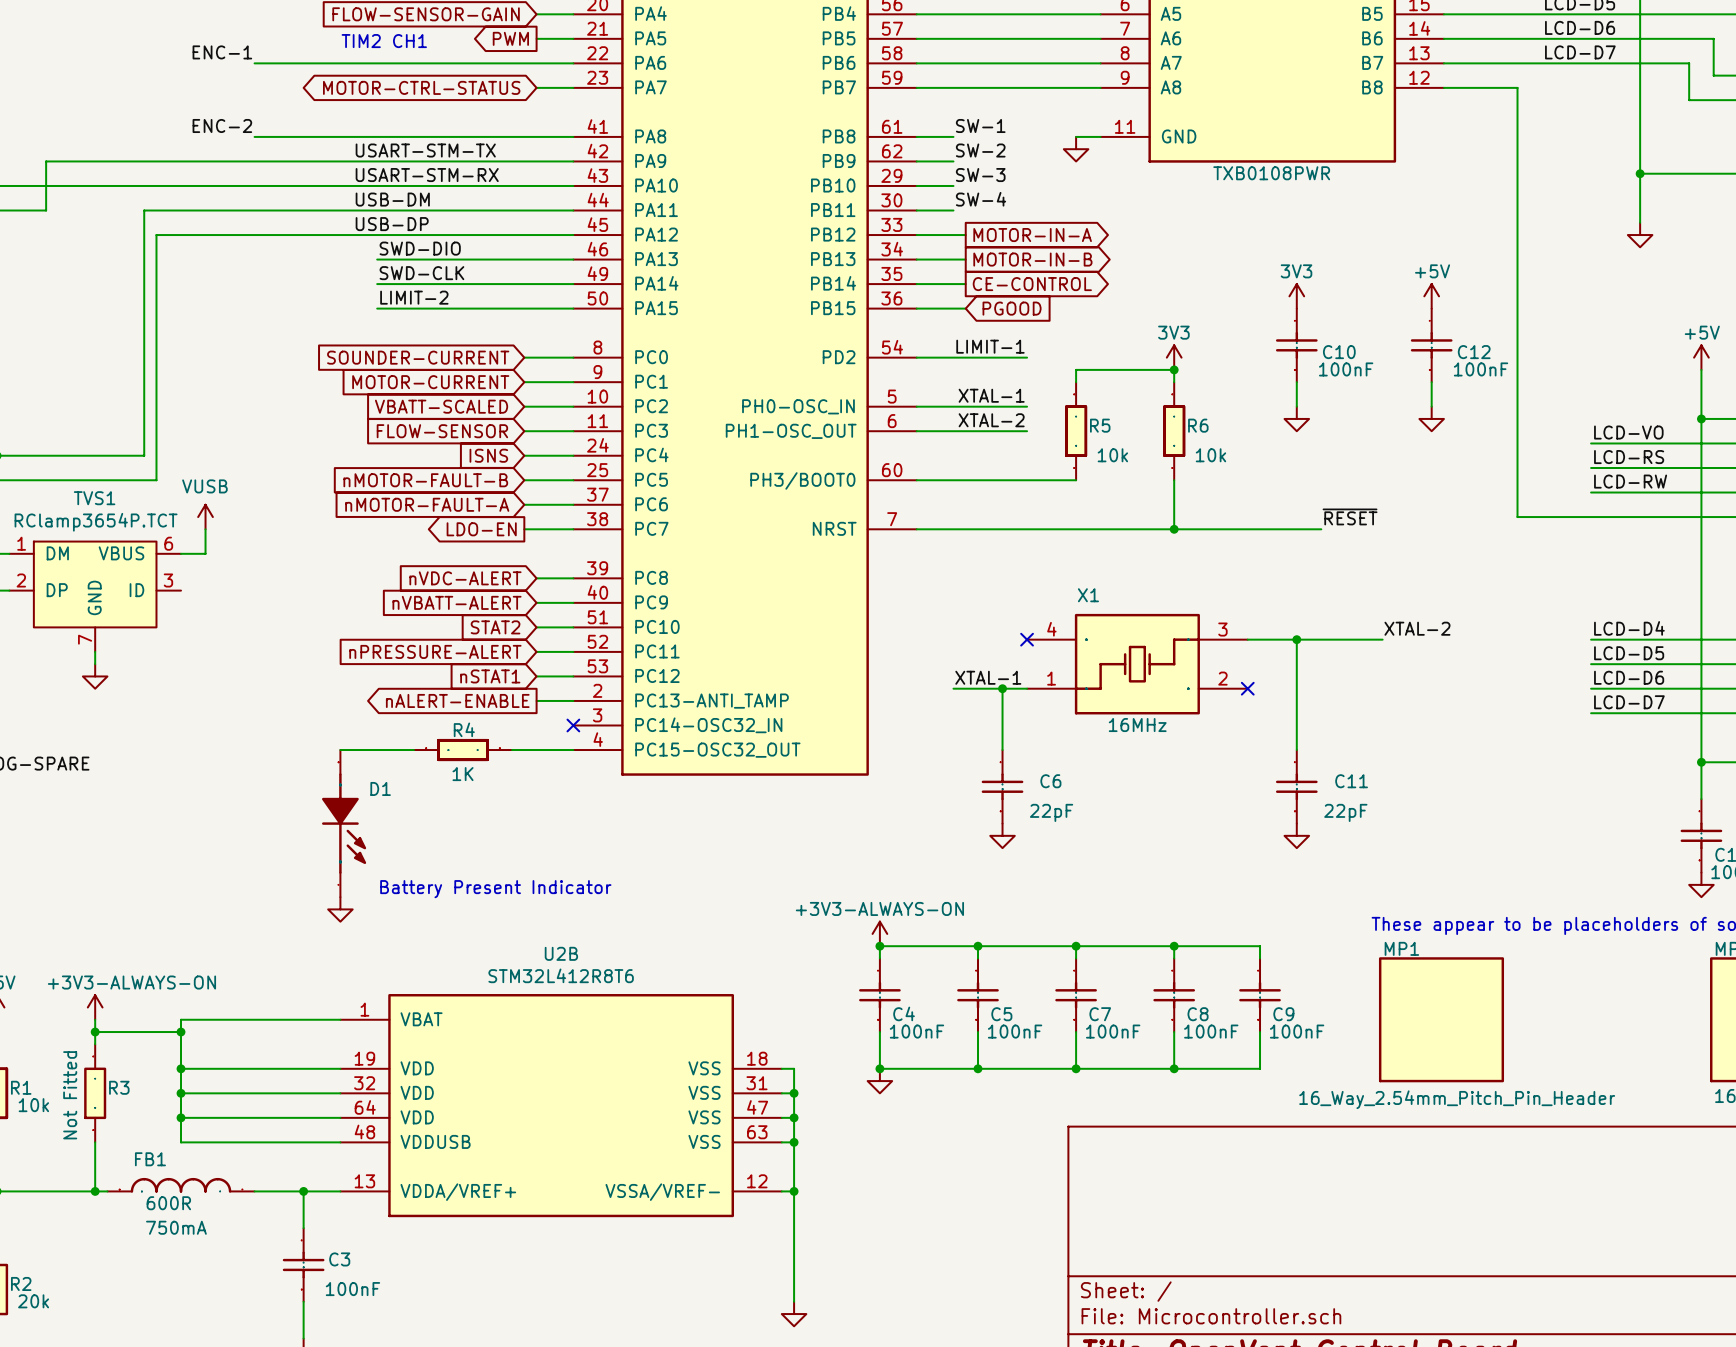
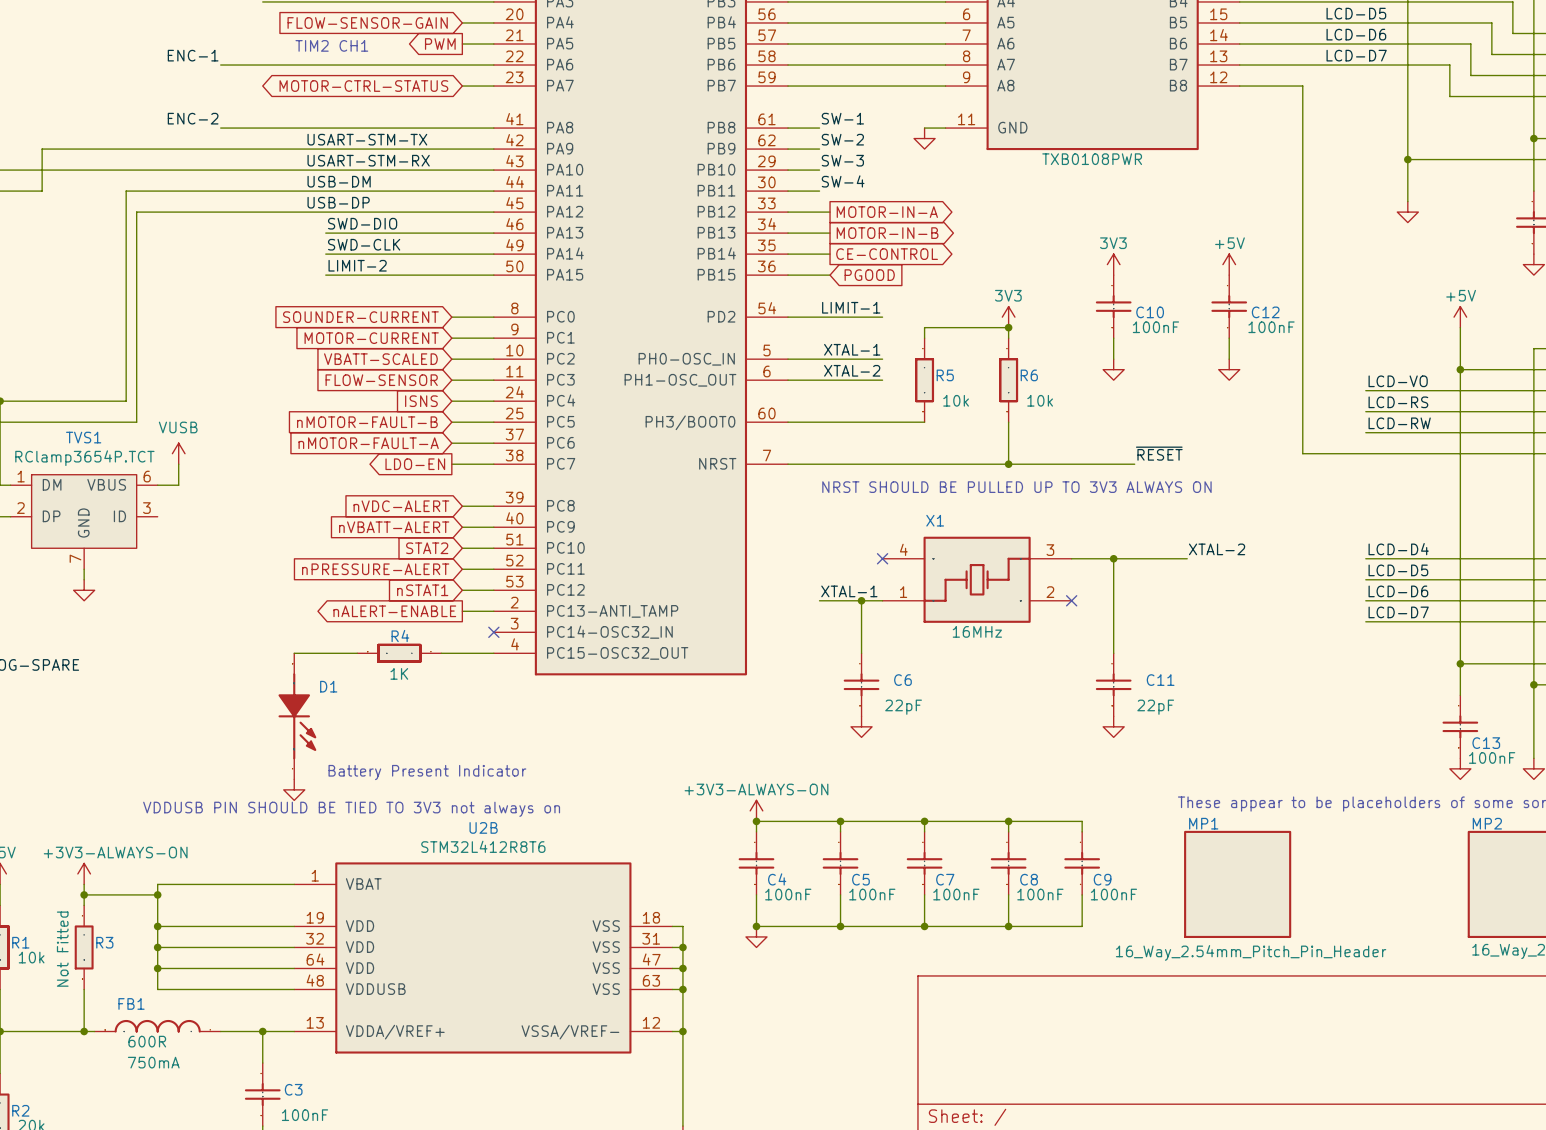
text: none -> NRST SHOULD BE PULLED UP TO 3V3 ALWAYS ON (1016, 487)
text: none -> VDDUSB PIN SHOULD BE TIED TO 3V3 not always on (351, 809)

